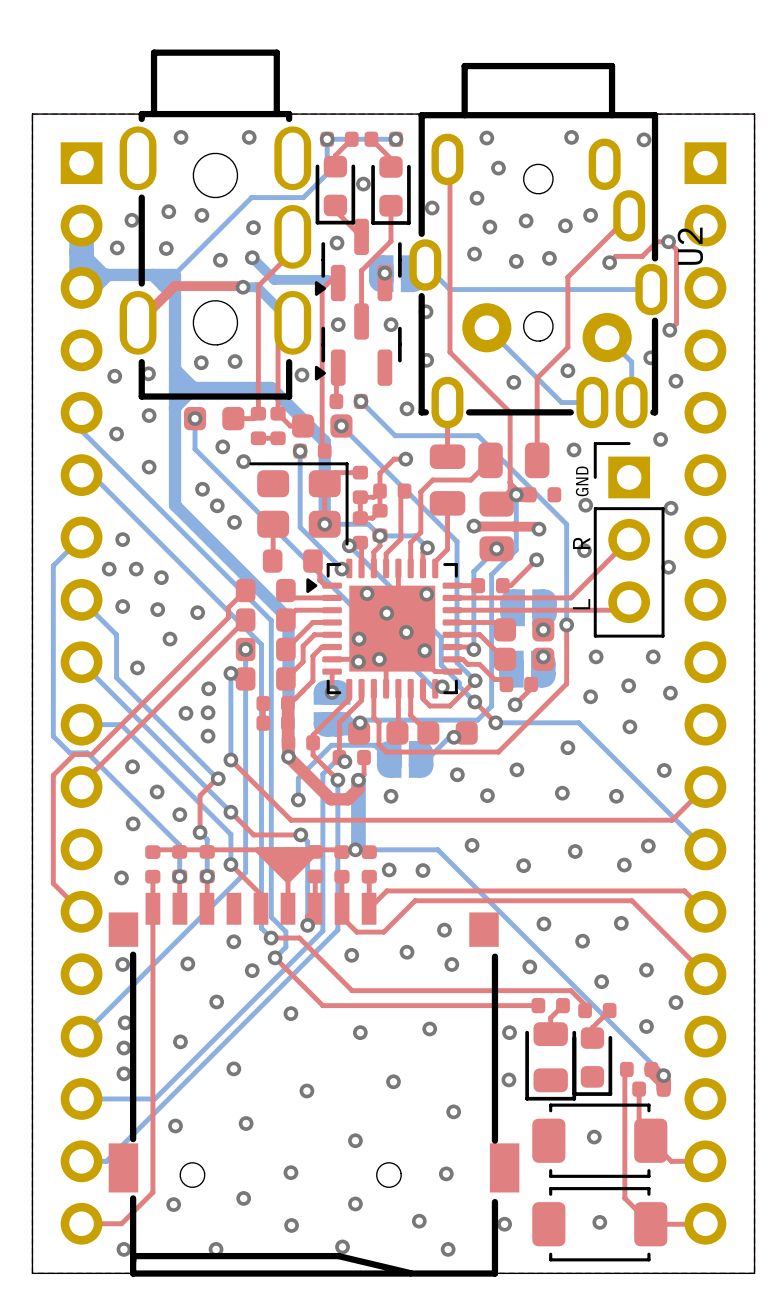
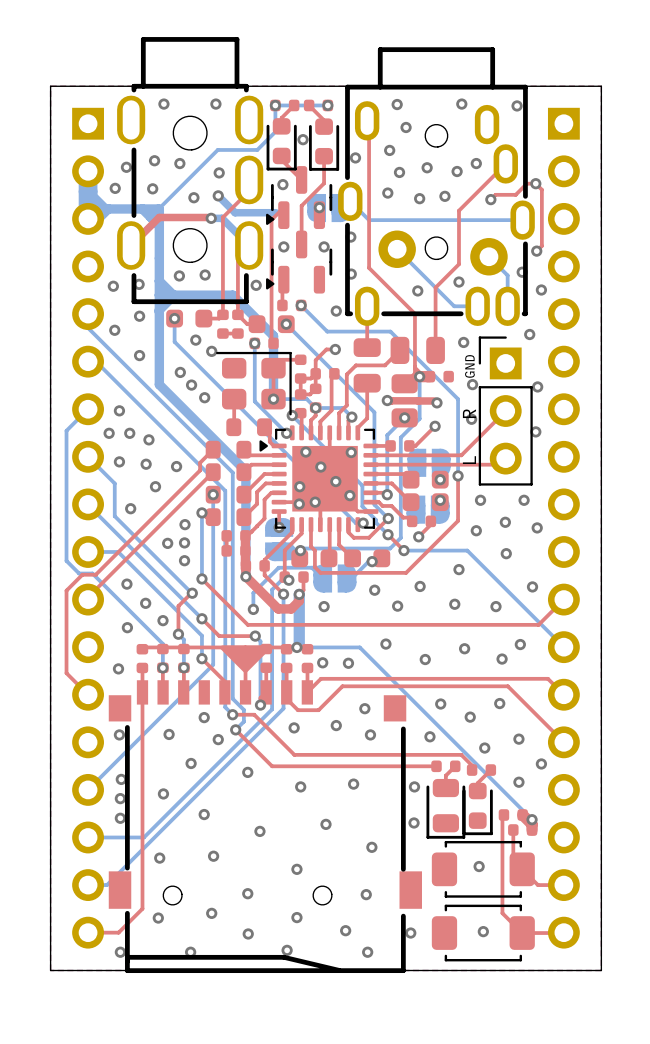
U2 name: U2 (690, 246) -> none

